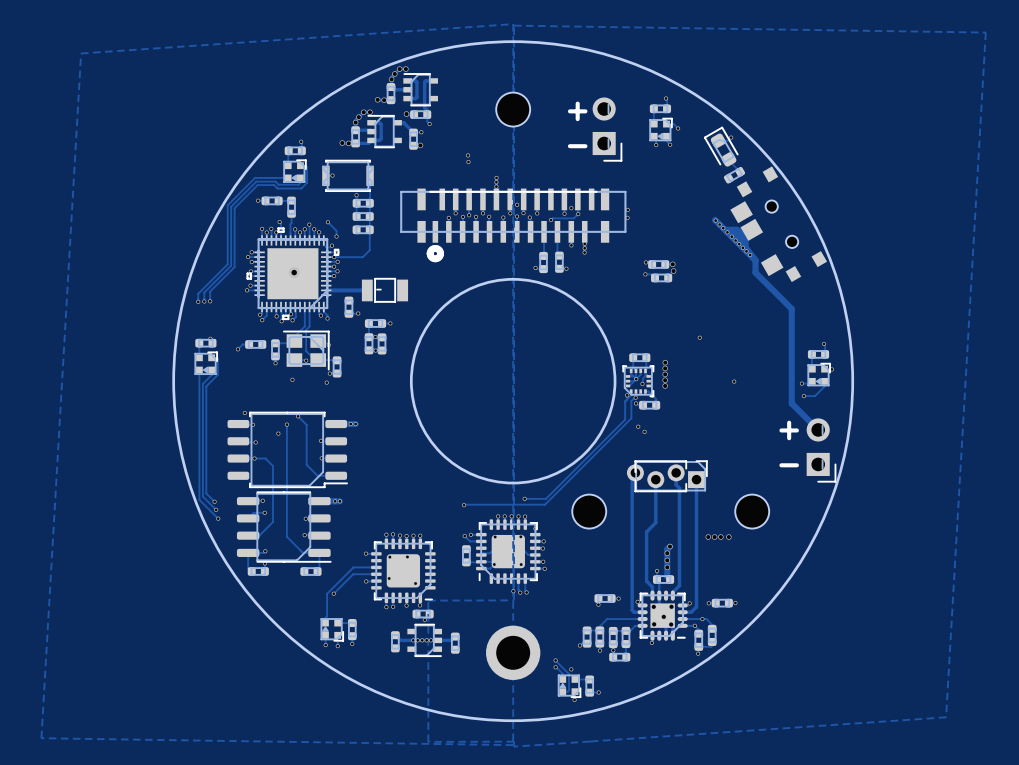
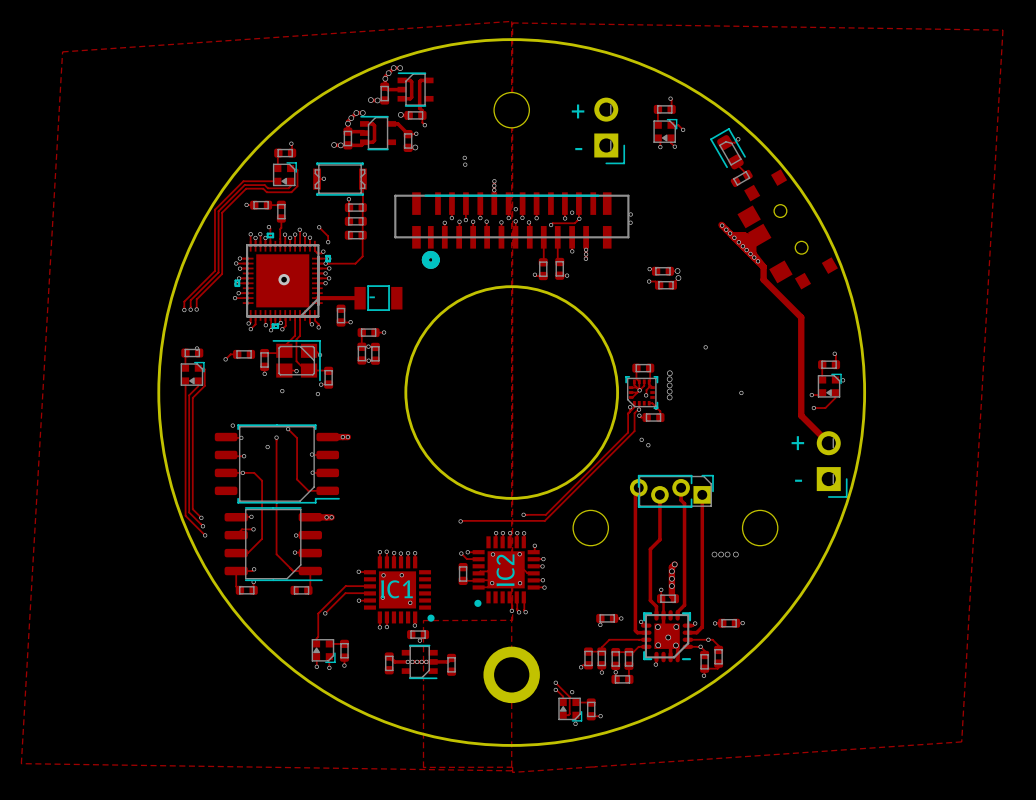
part: (508, 551) -> none
IC2: none -> (506, 571)
part: (403, 570) -> none
IC1: none -> (399, 589)
via: (406, 605) -> none

